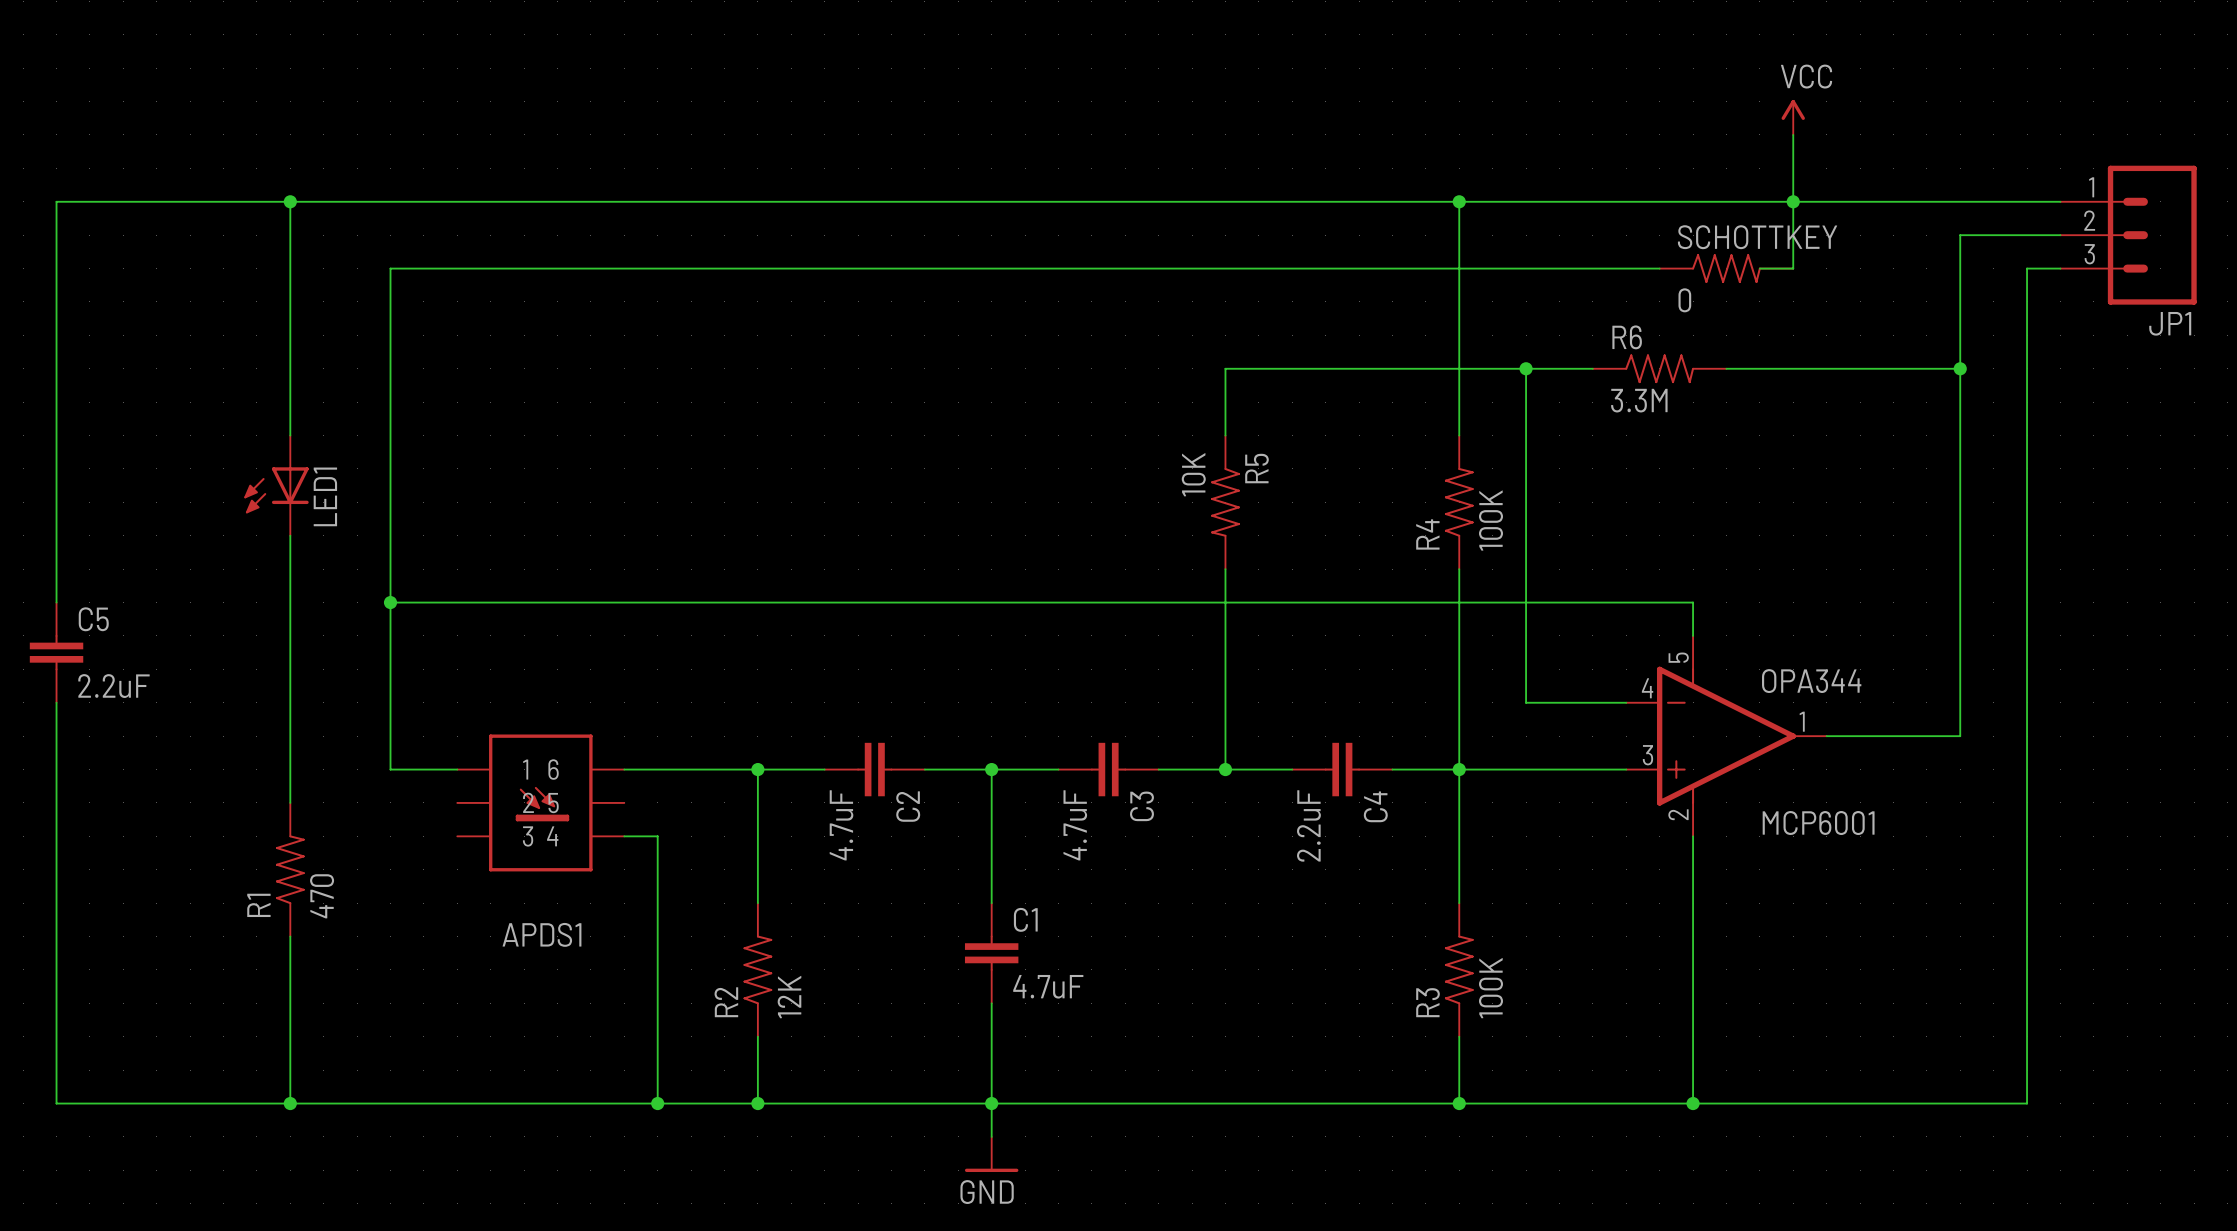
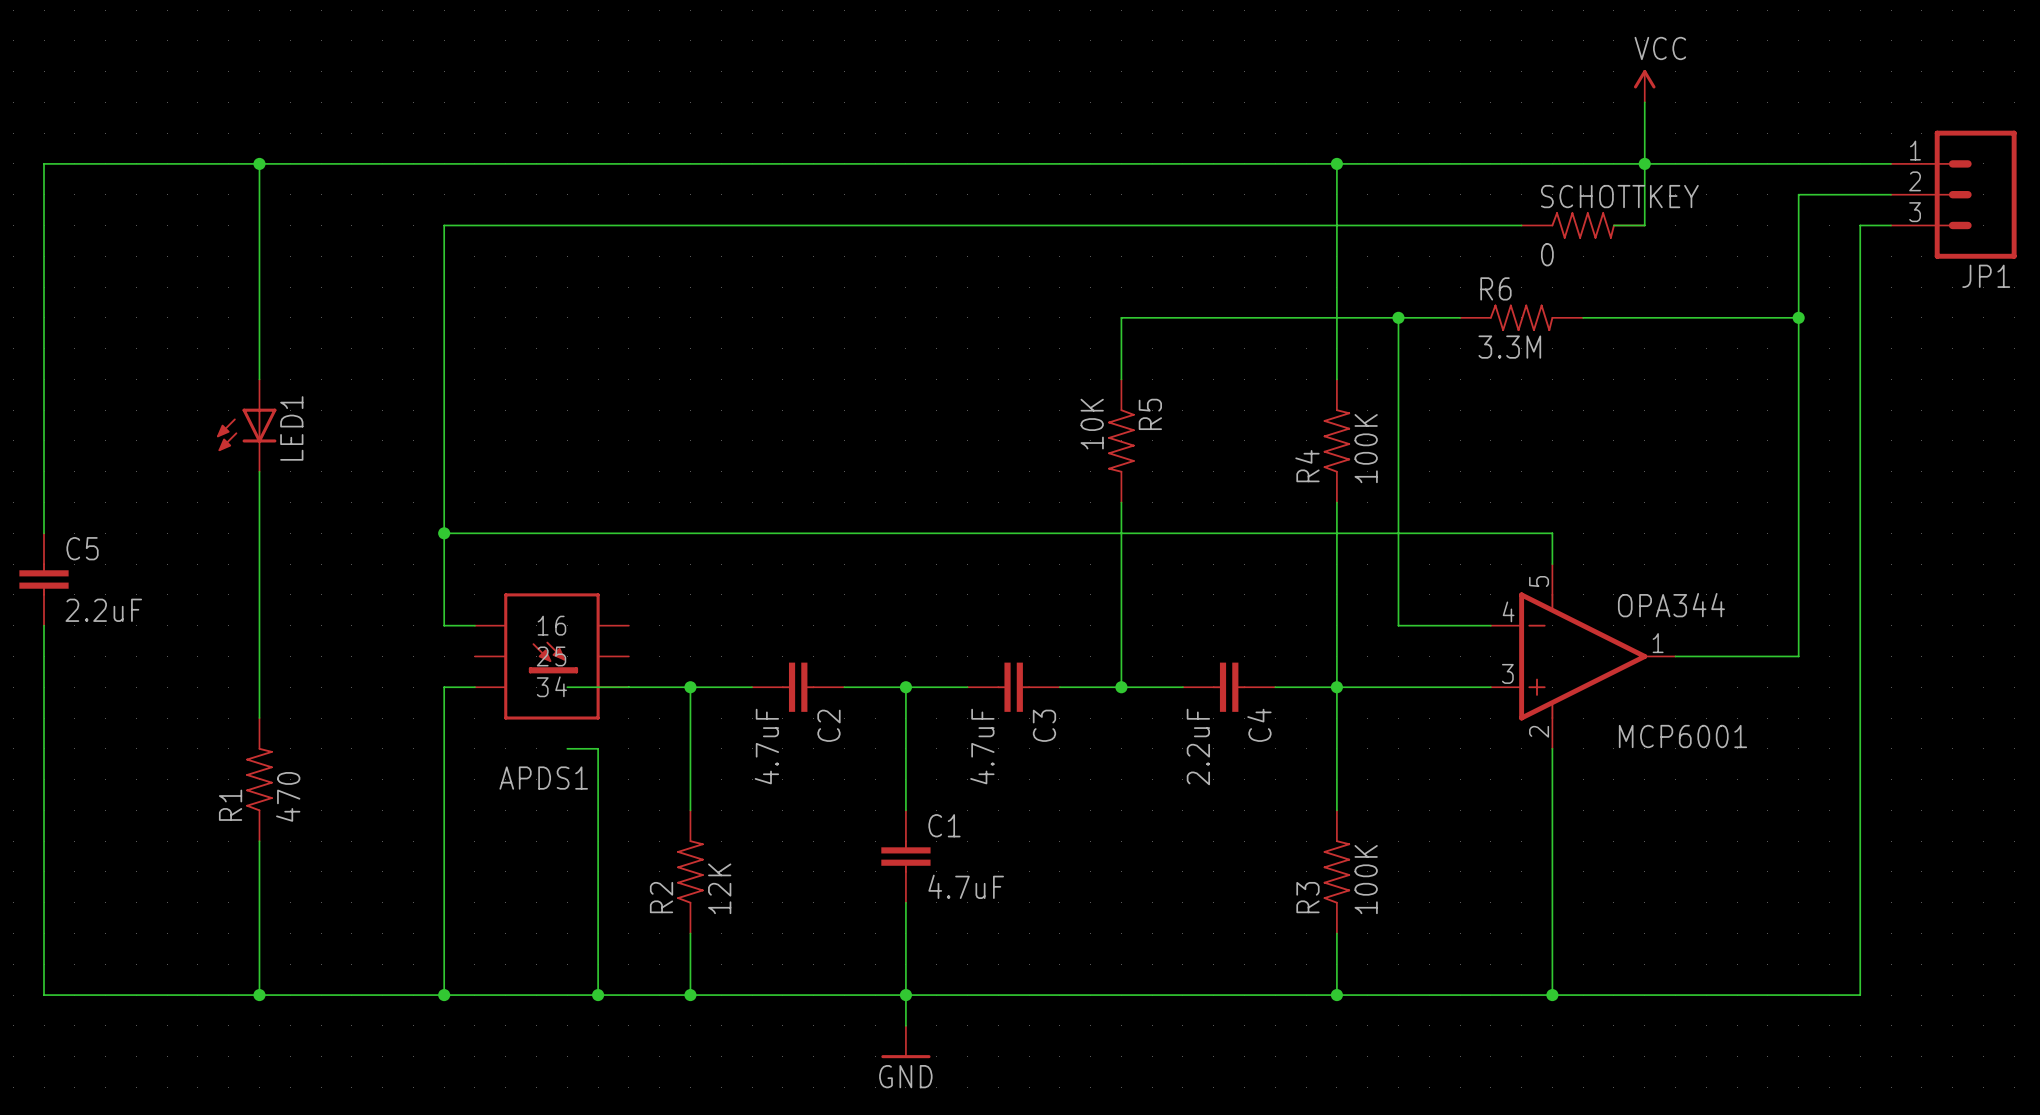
wire: (490, 268) (390, 268) (390, 769) (457, 769) -> (444, 225) (444, 625) (474, 625)
wire: (390, 602) (490, 602) -> none
junction: (390, 602) -> none
junction: none -> (444, 533)
wire: none -> (474, 687) (444, 687) (444, 995)
APDS1 position: (540, 802) -> (551, 656)
junction: none -> (444, 995)

